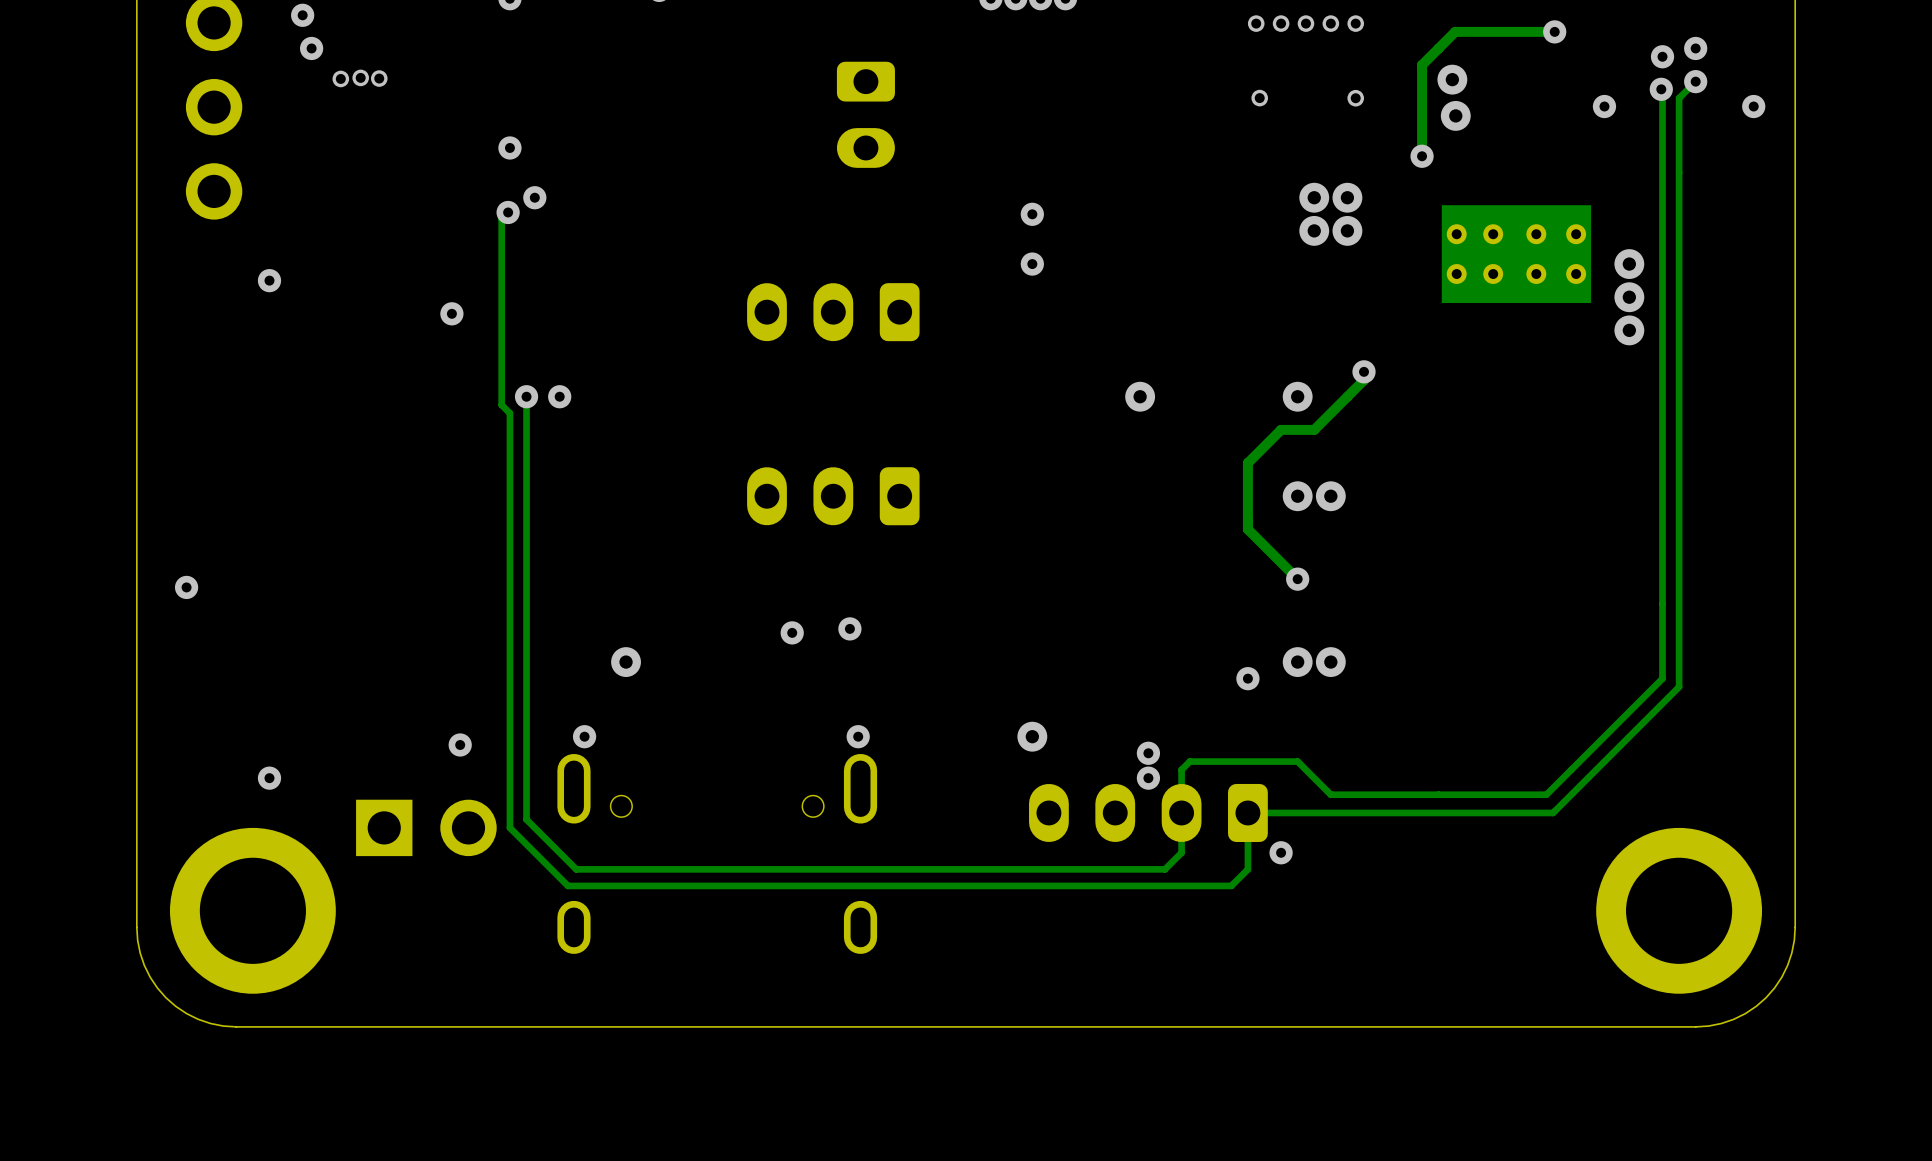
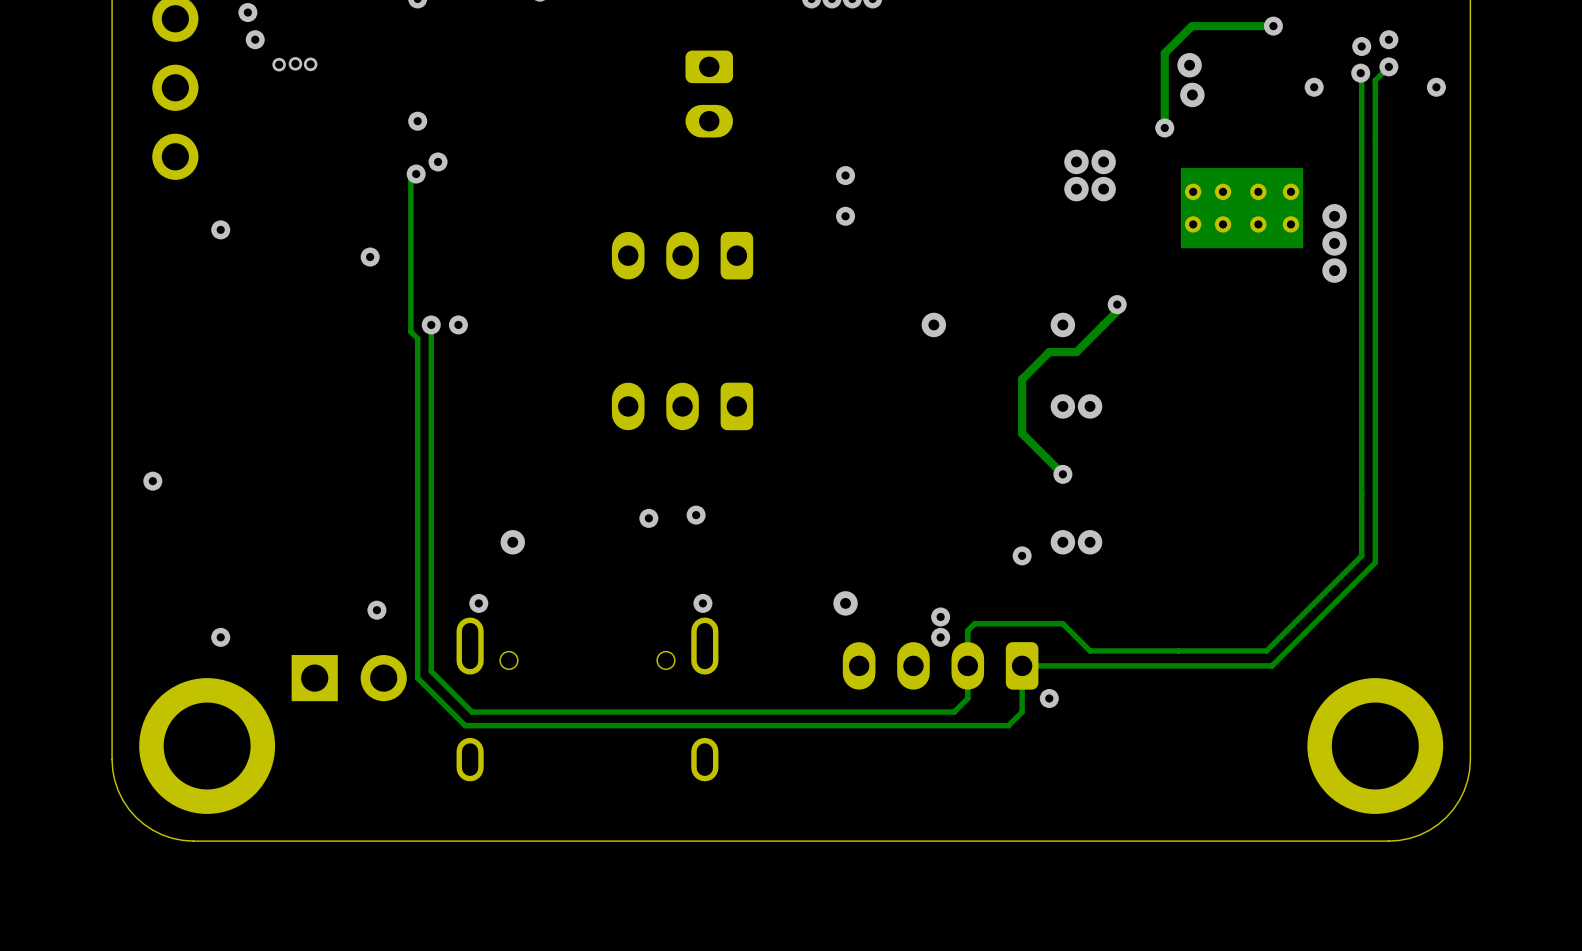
via: (1256, 23) -> none
via: (1281, 23) -> none
via: (1305, 23) -> none
via: (1330, 23) -> none
via: (1355, 23) -> none
via: (1259, 98) -> none
via: (1355, 98) -> none

